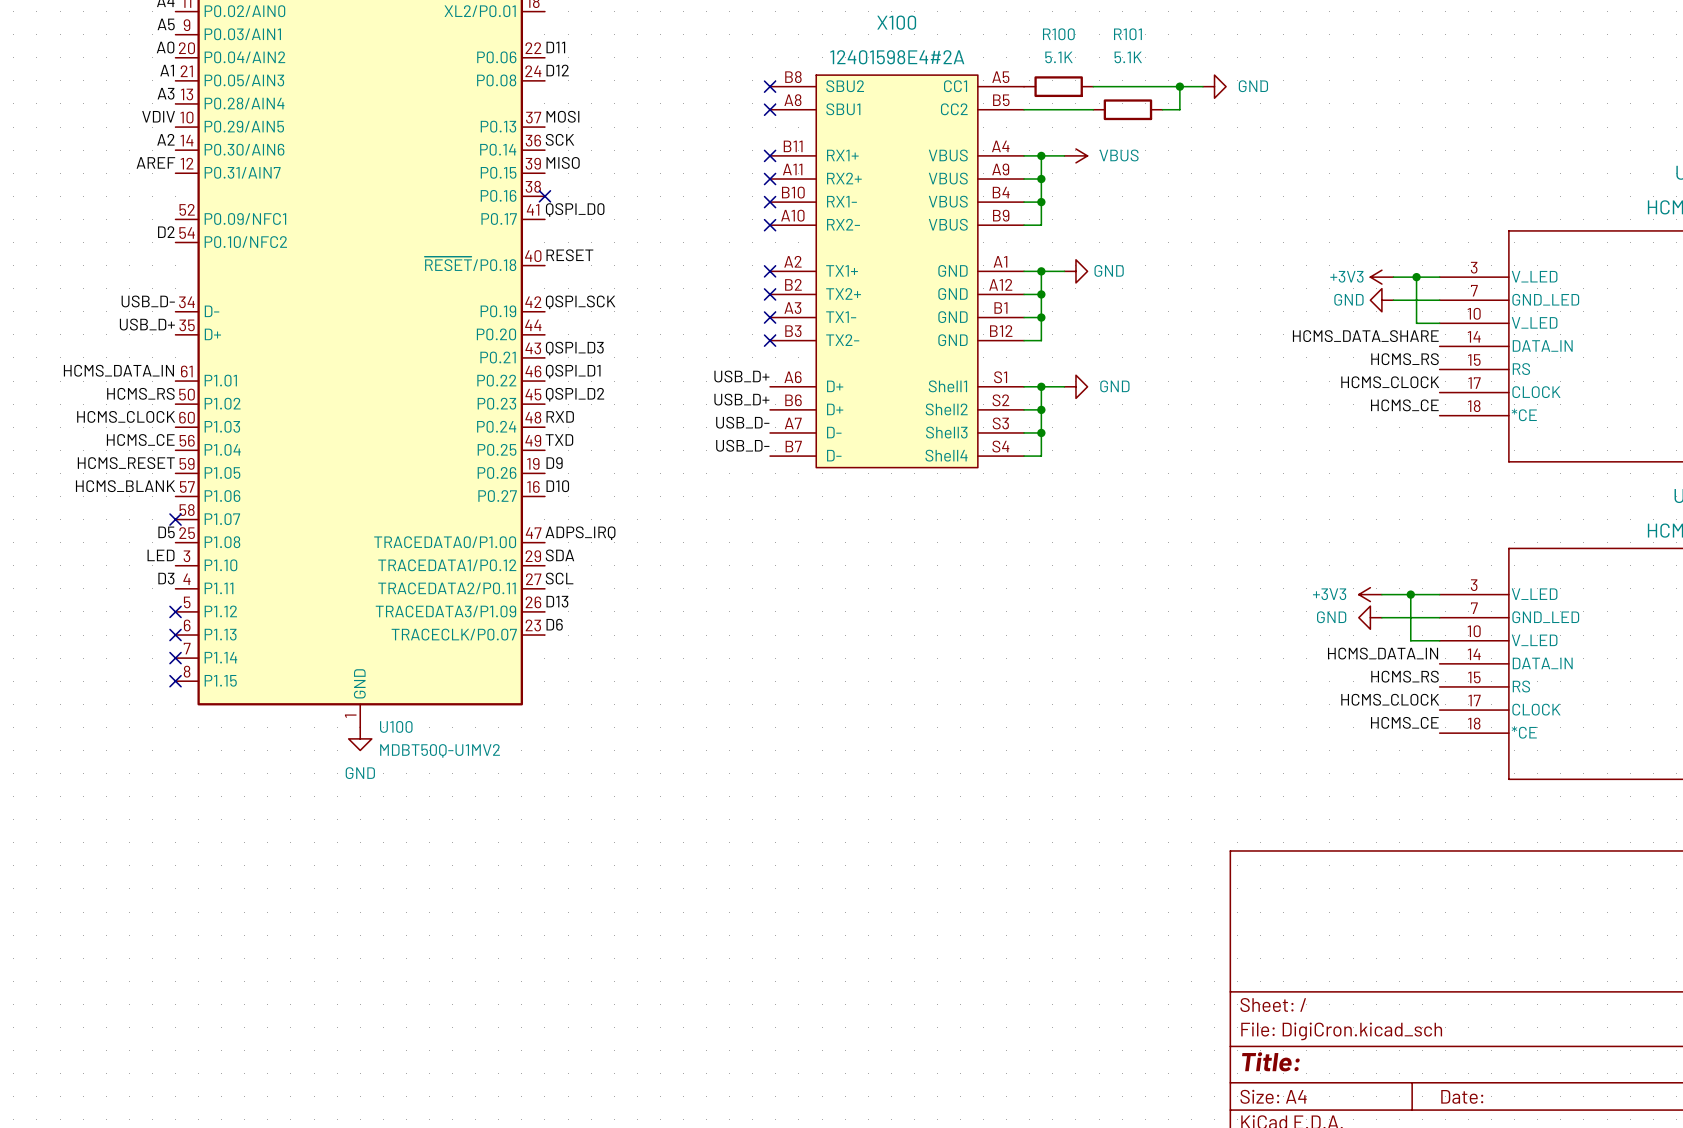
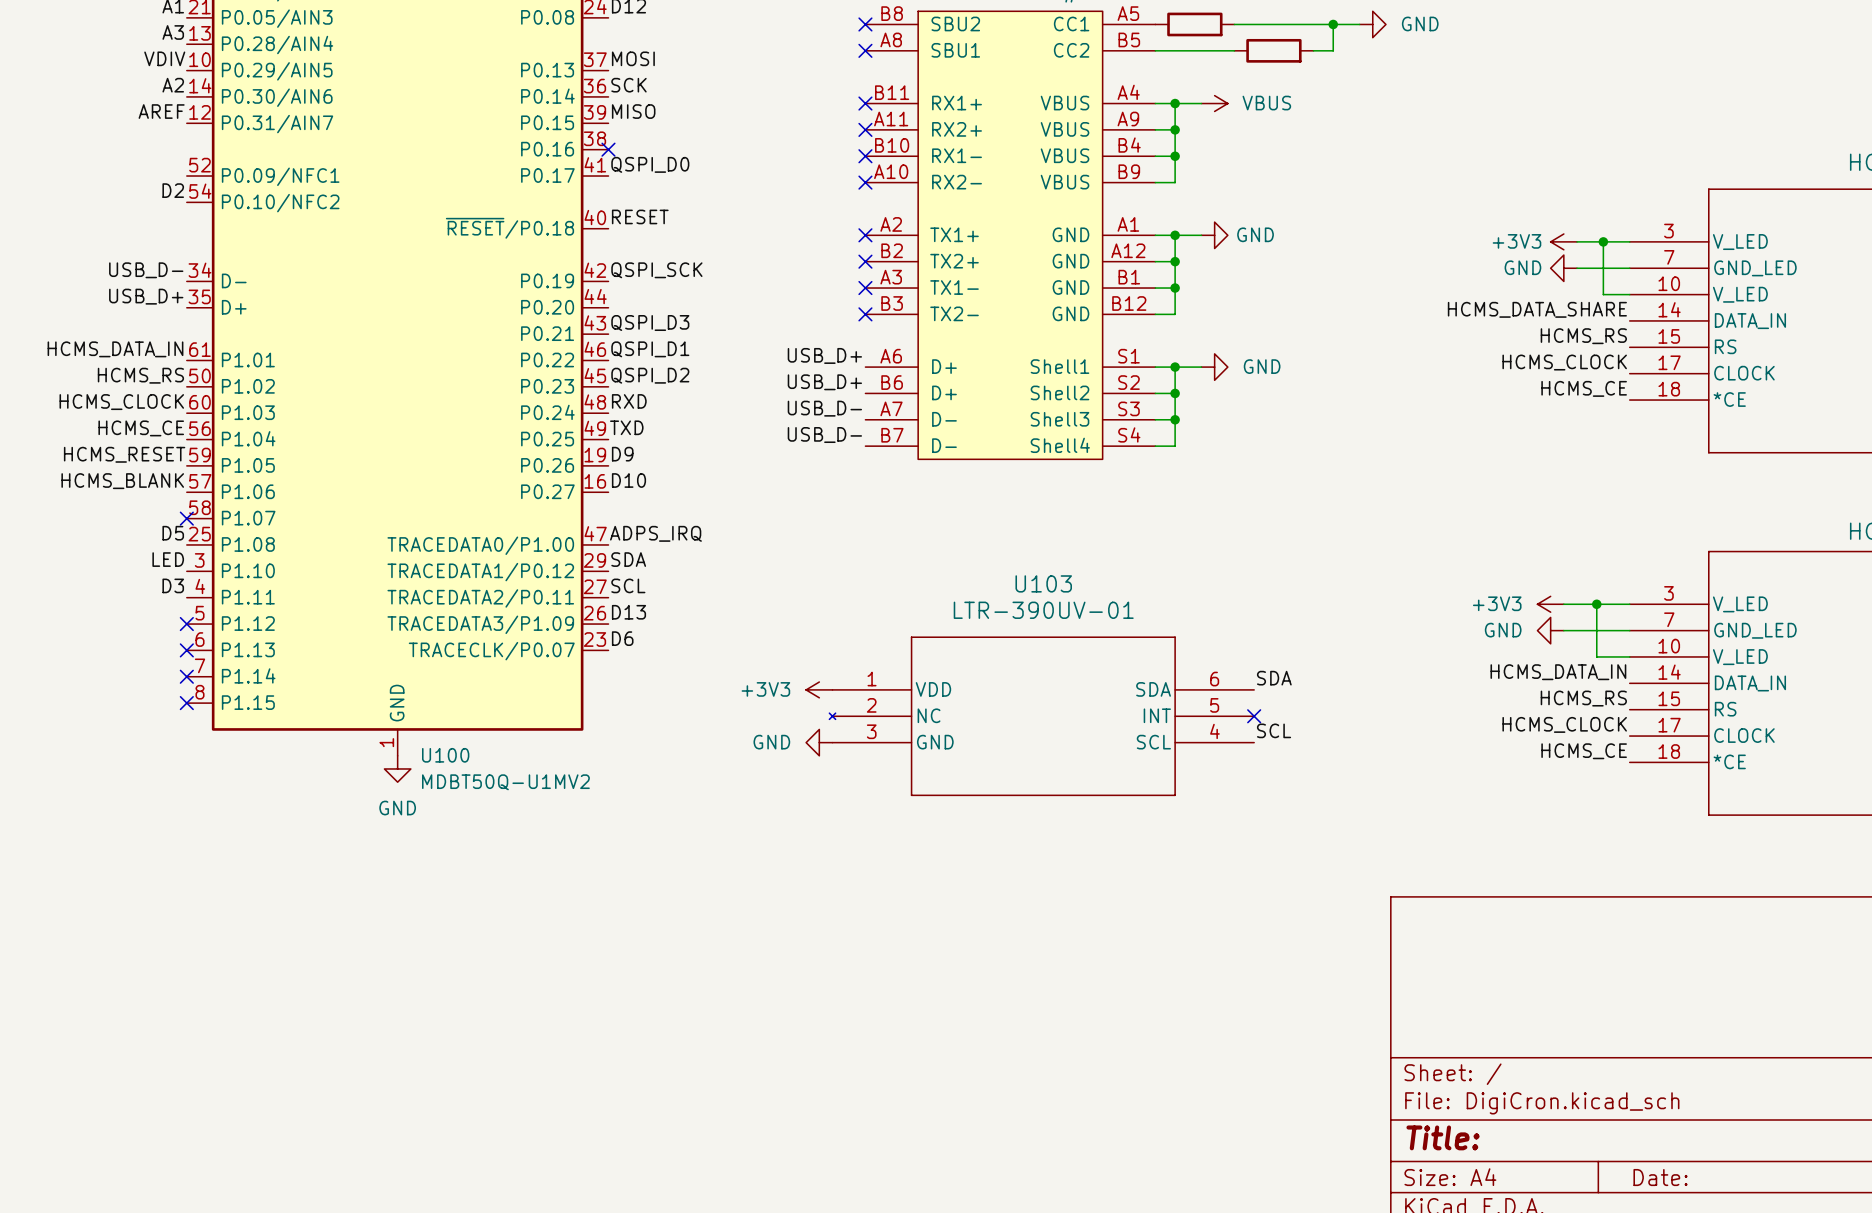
label: none -> SDA (1274, 678)
power symbol: none -> +3V3 (819, 689)
U103: none -> LTR-390UV-01 (1041, 716)
no-connect mark: none -> (1254, 716)
label: none -> SCL (1274, 730)
power symbol: none -> GND (819, 742)

